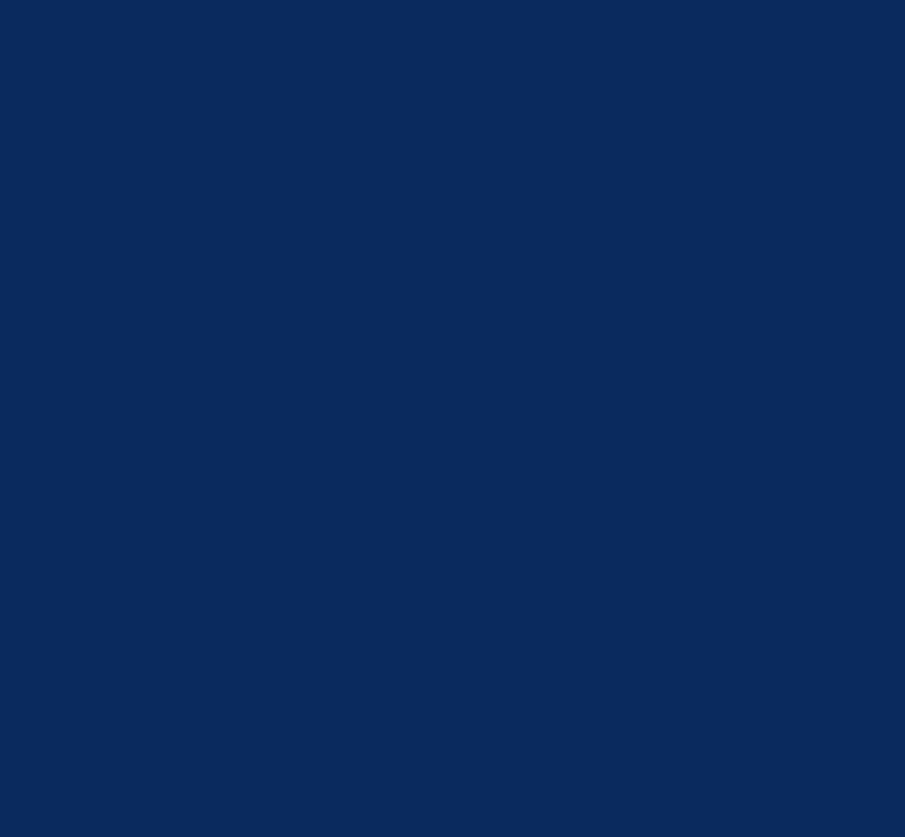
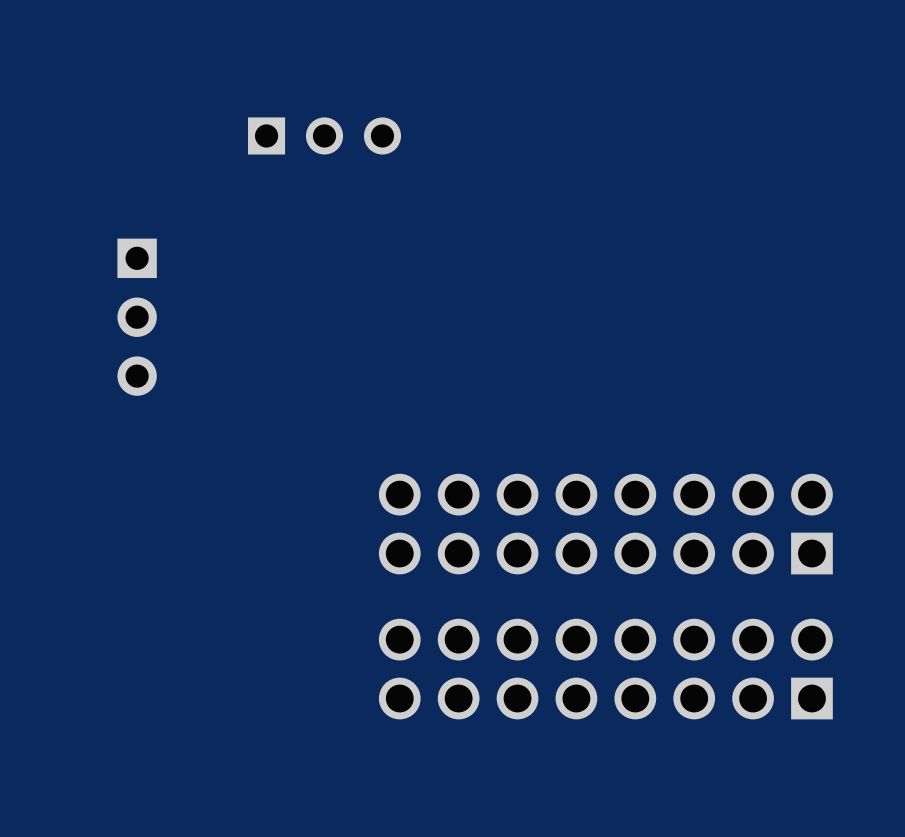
part: none -> (324, 135)
part: none -> (137, 317)
part: none -> (605, 524)
part: none -> (605, 669)

